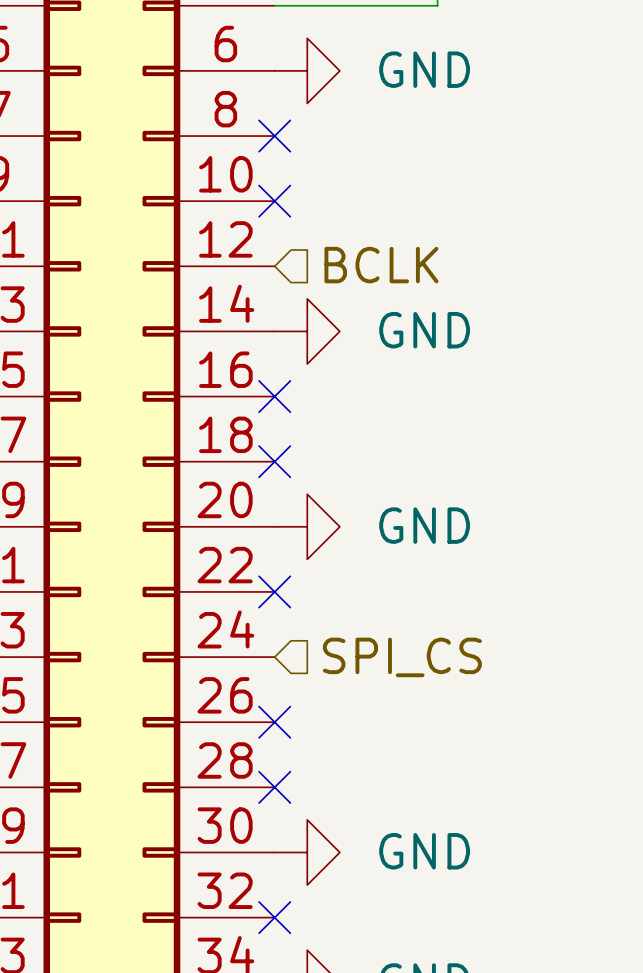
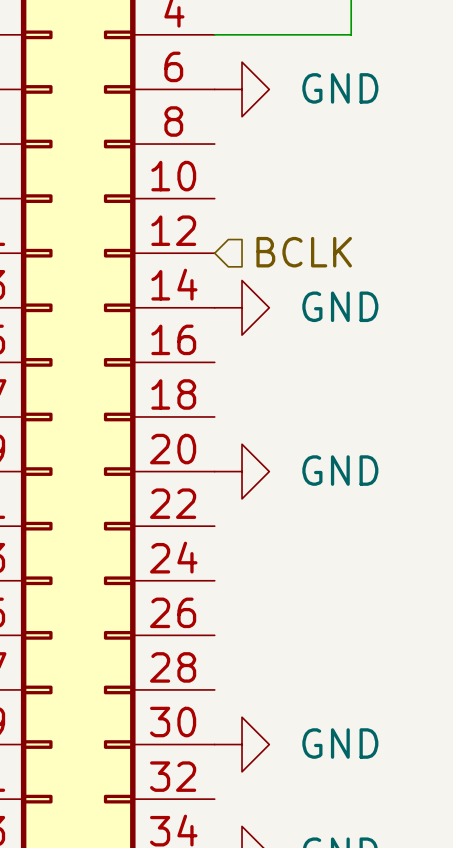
no-connect mark: (274, 136) -> none
no-connect mark: (274, 201) -> none
no-connect mark: (274, 396) -> none
no-connect mark: (274, 461) -> none
no-connect mark: (274, 591) -> none
hierarchical label: SPI_CS (402, 657) -> none
no-connect mark: (274, 722) -> none
no-connect mark: (274, 787) -> none
no-connect mark: (274, 917) -> none

